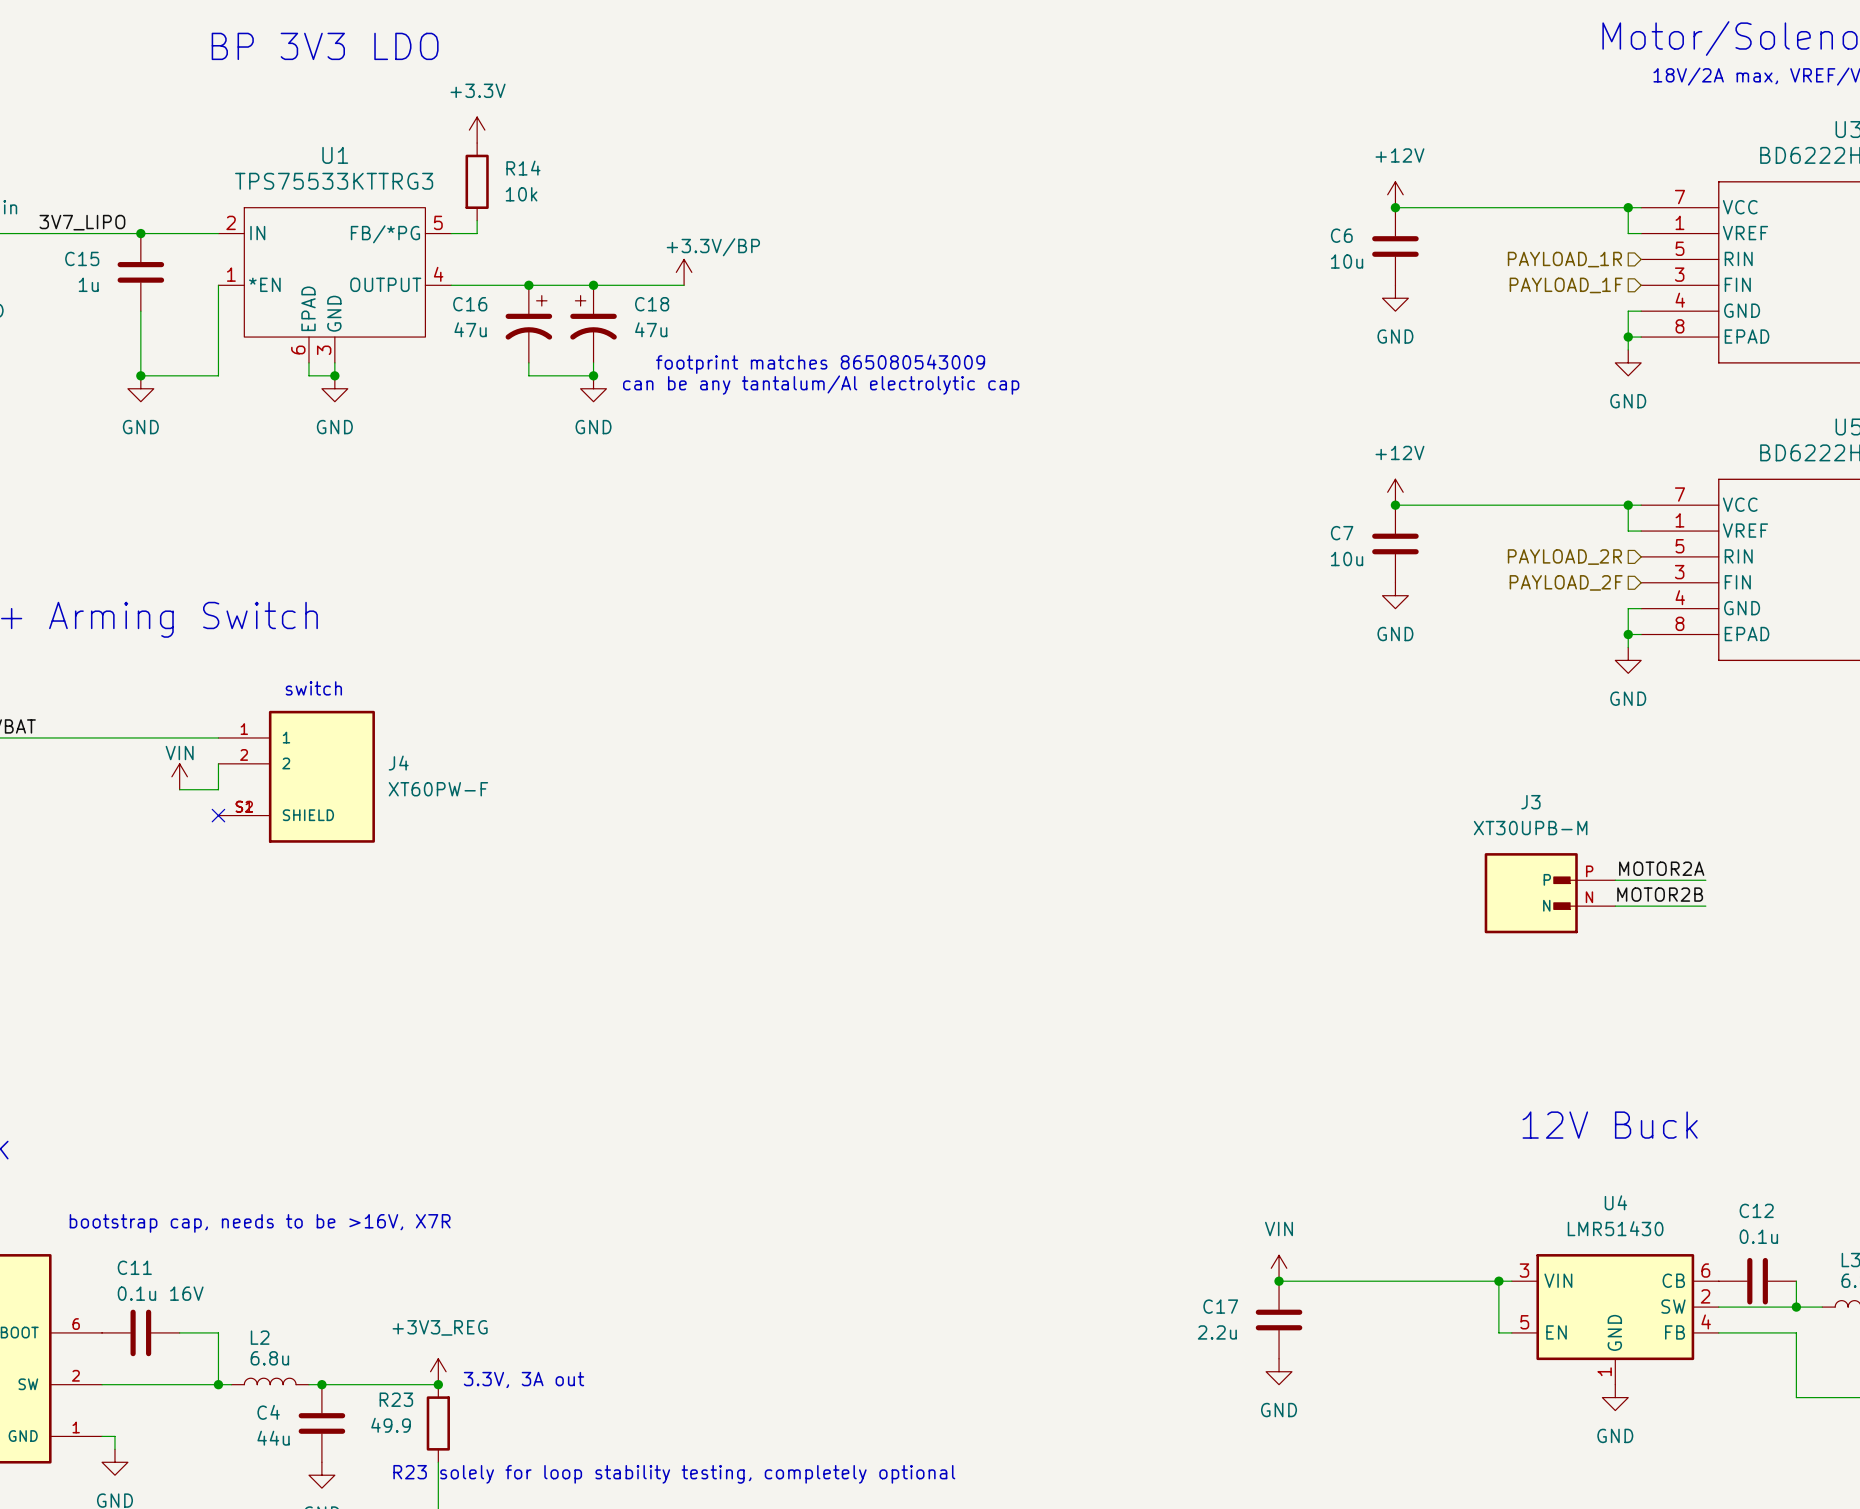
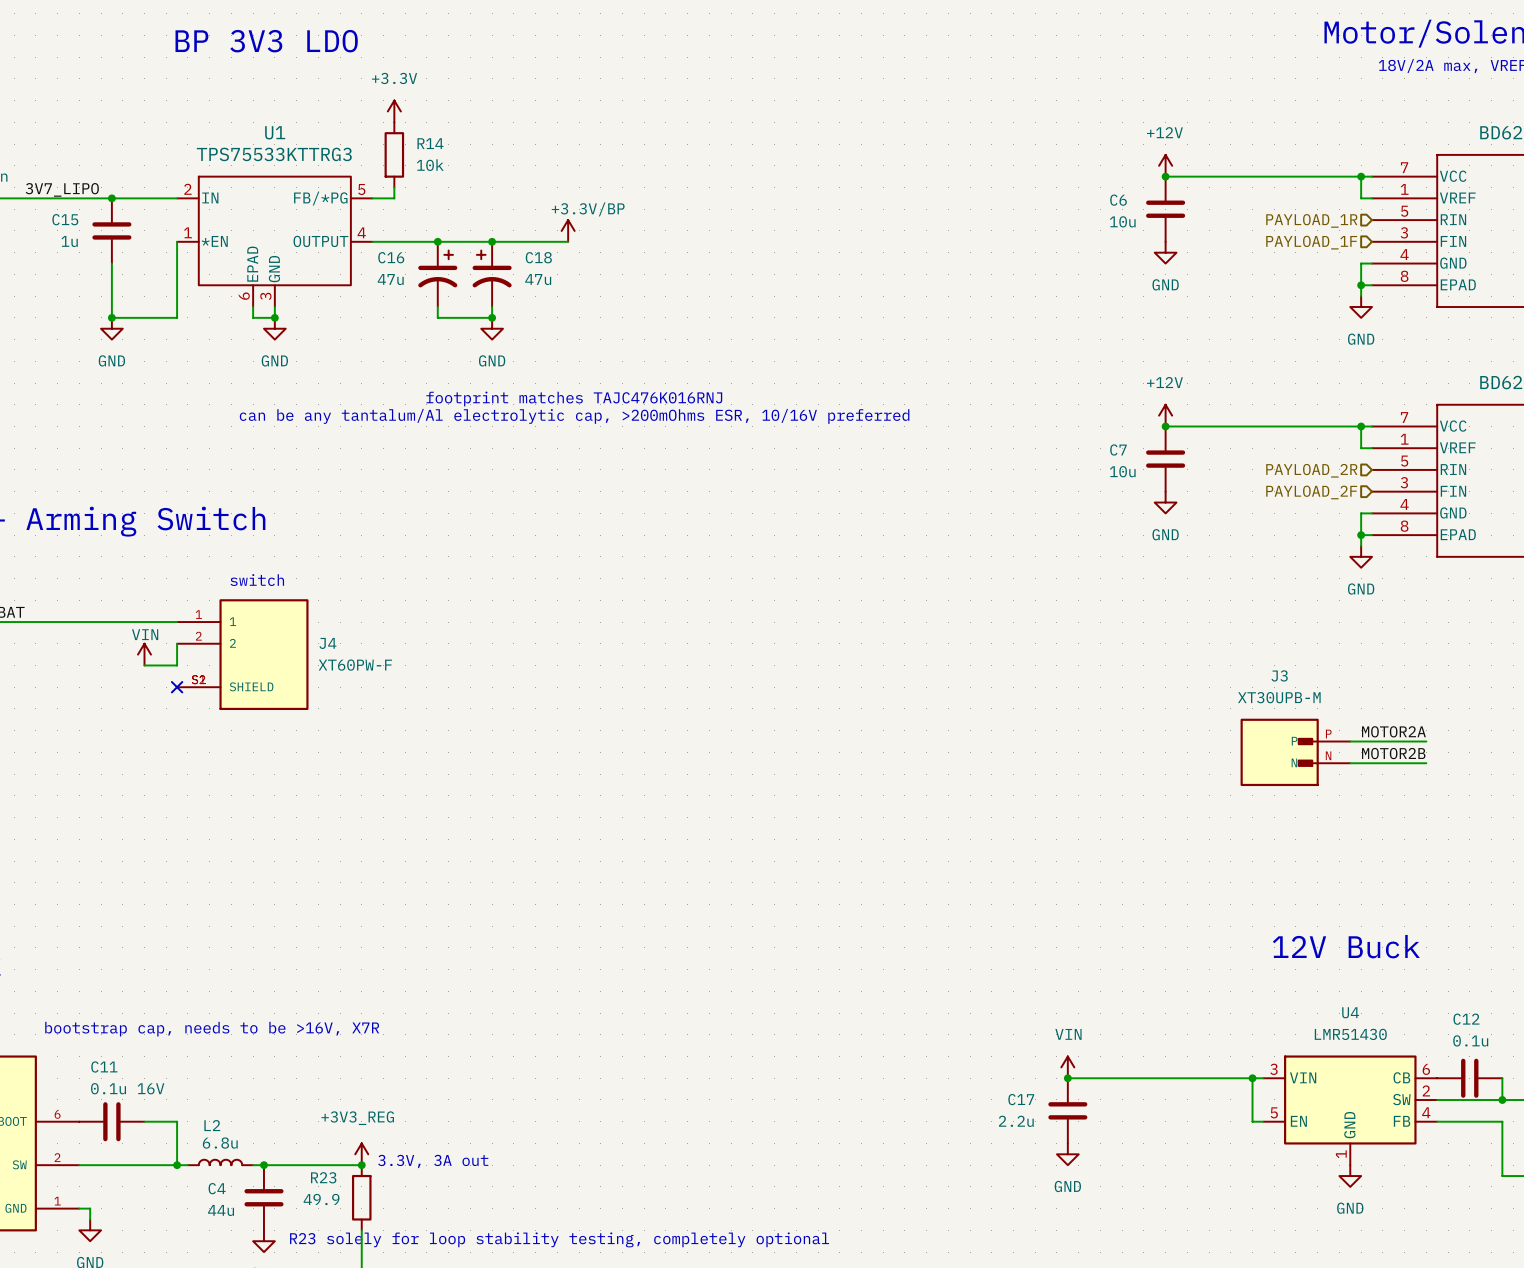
text: footprint matches 865080543009 (820, 364) -> none
text: can be any tantalum/Al electrolytic cap (821, 385) -> none
text: none -> footprint matches TAJC476K016RNJ (574, 398)
text: none -> can be any tantalum/Al electrolytic cap, >200mOhms ESR, 10/16V preferred (574, 416)

